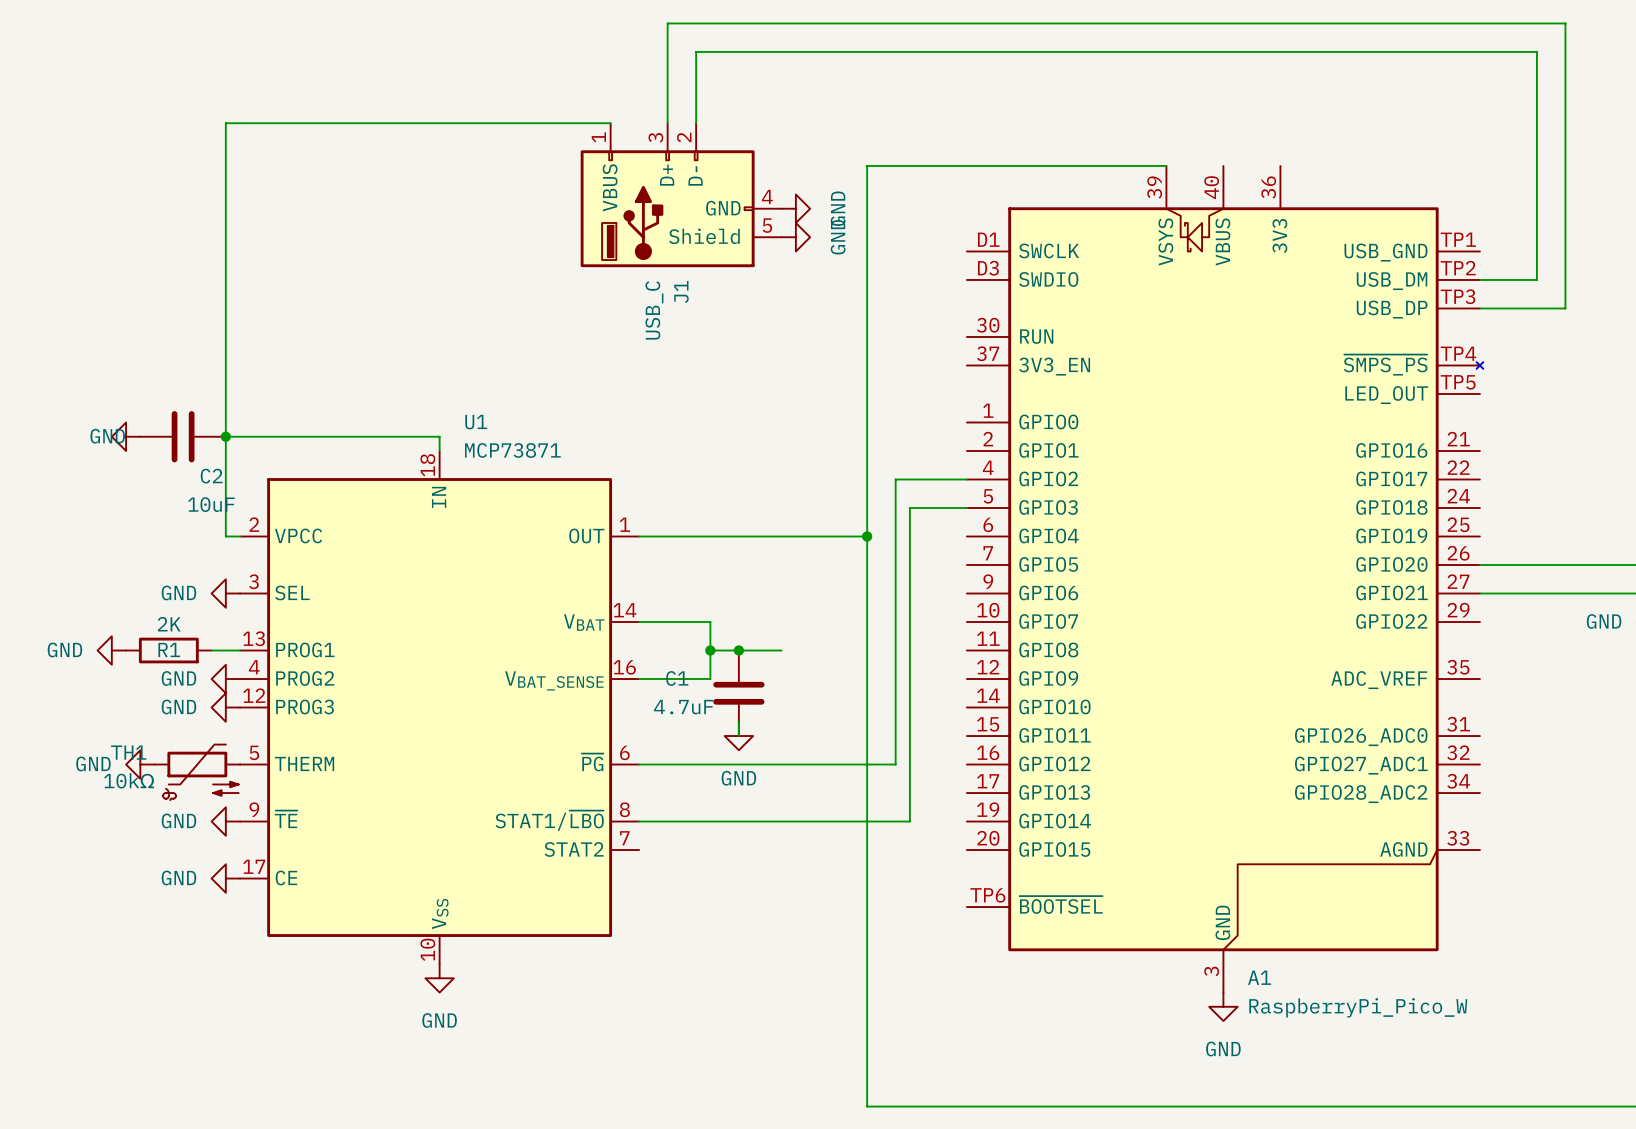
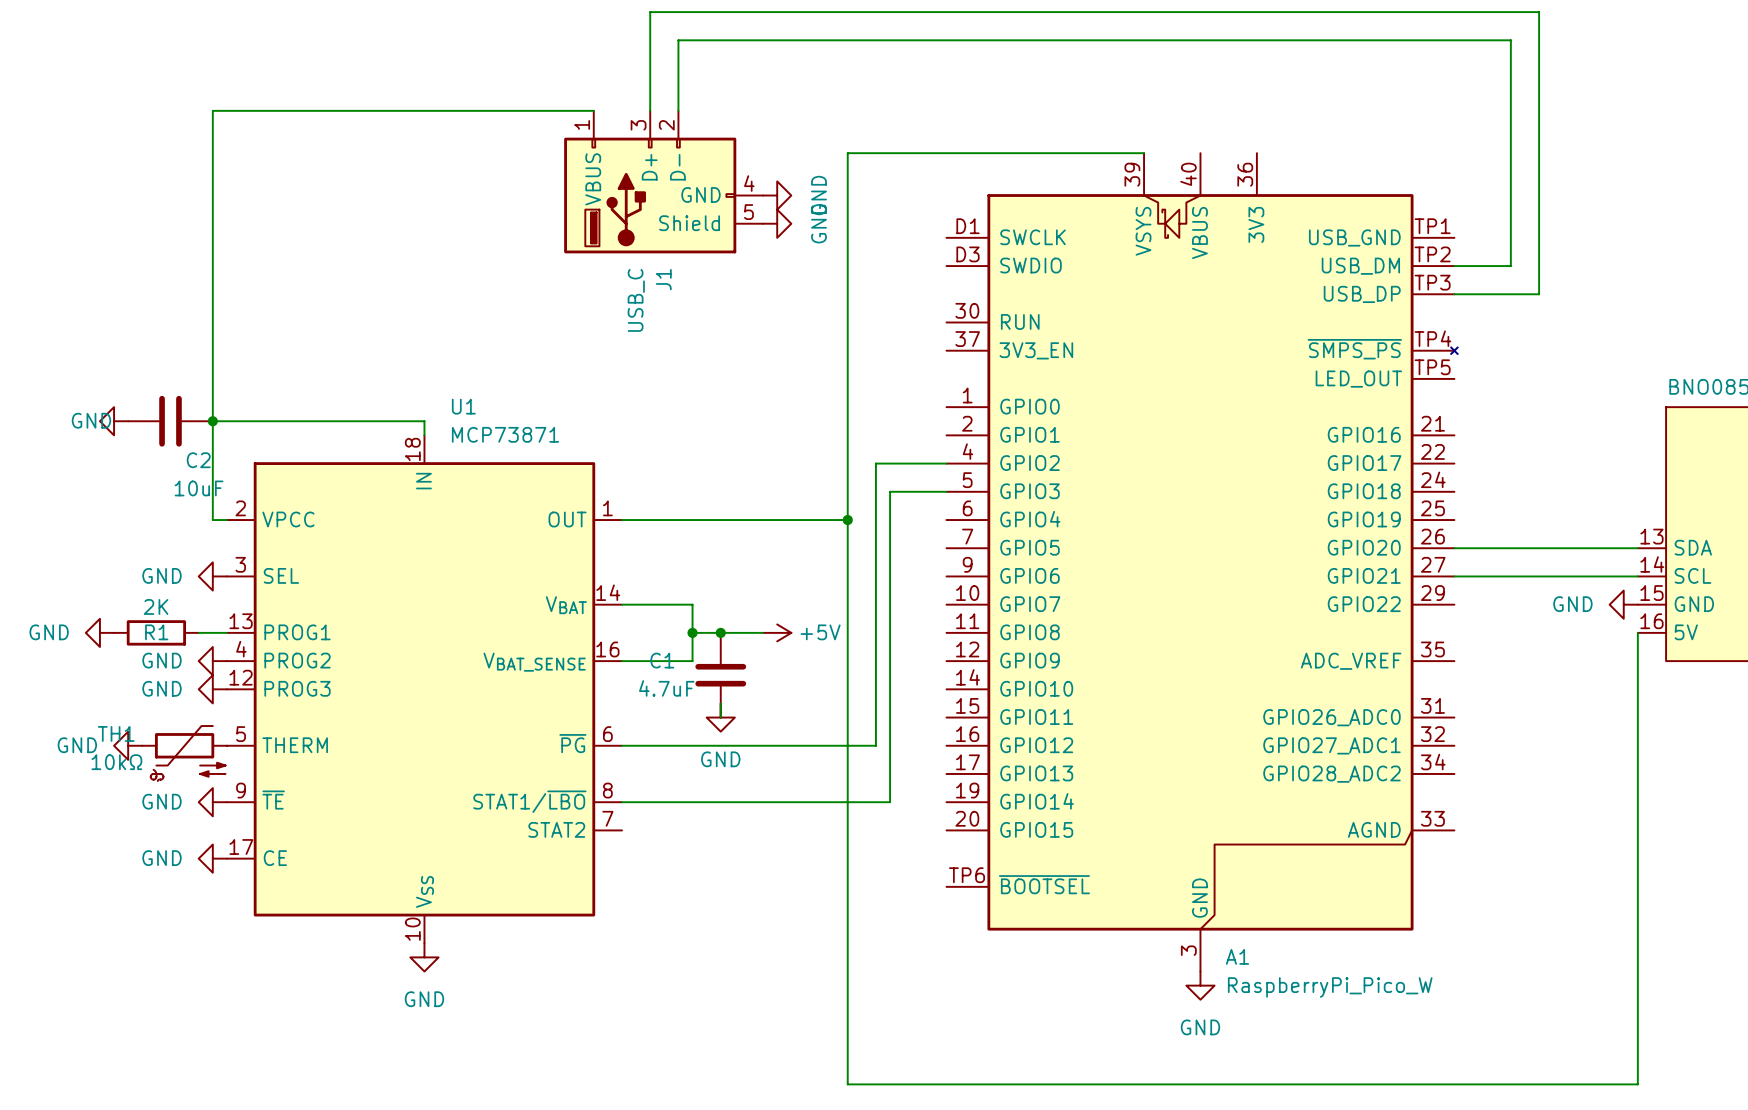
power symbol: none -> +5V (777, 632)

